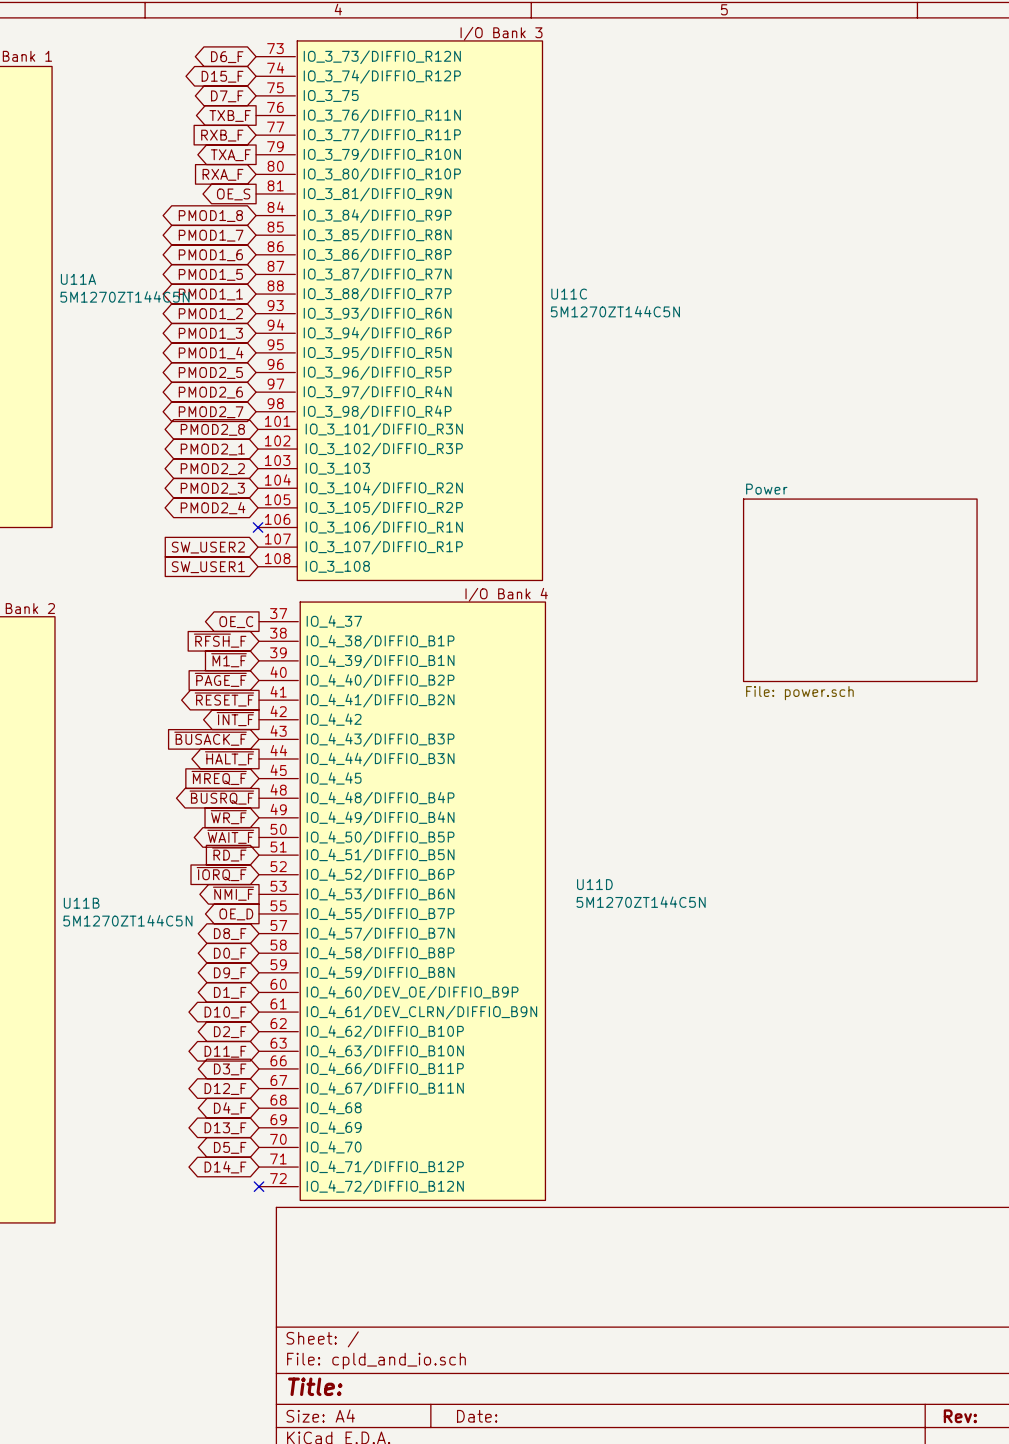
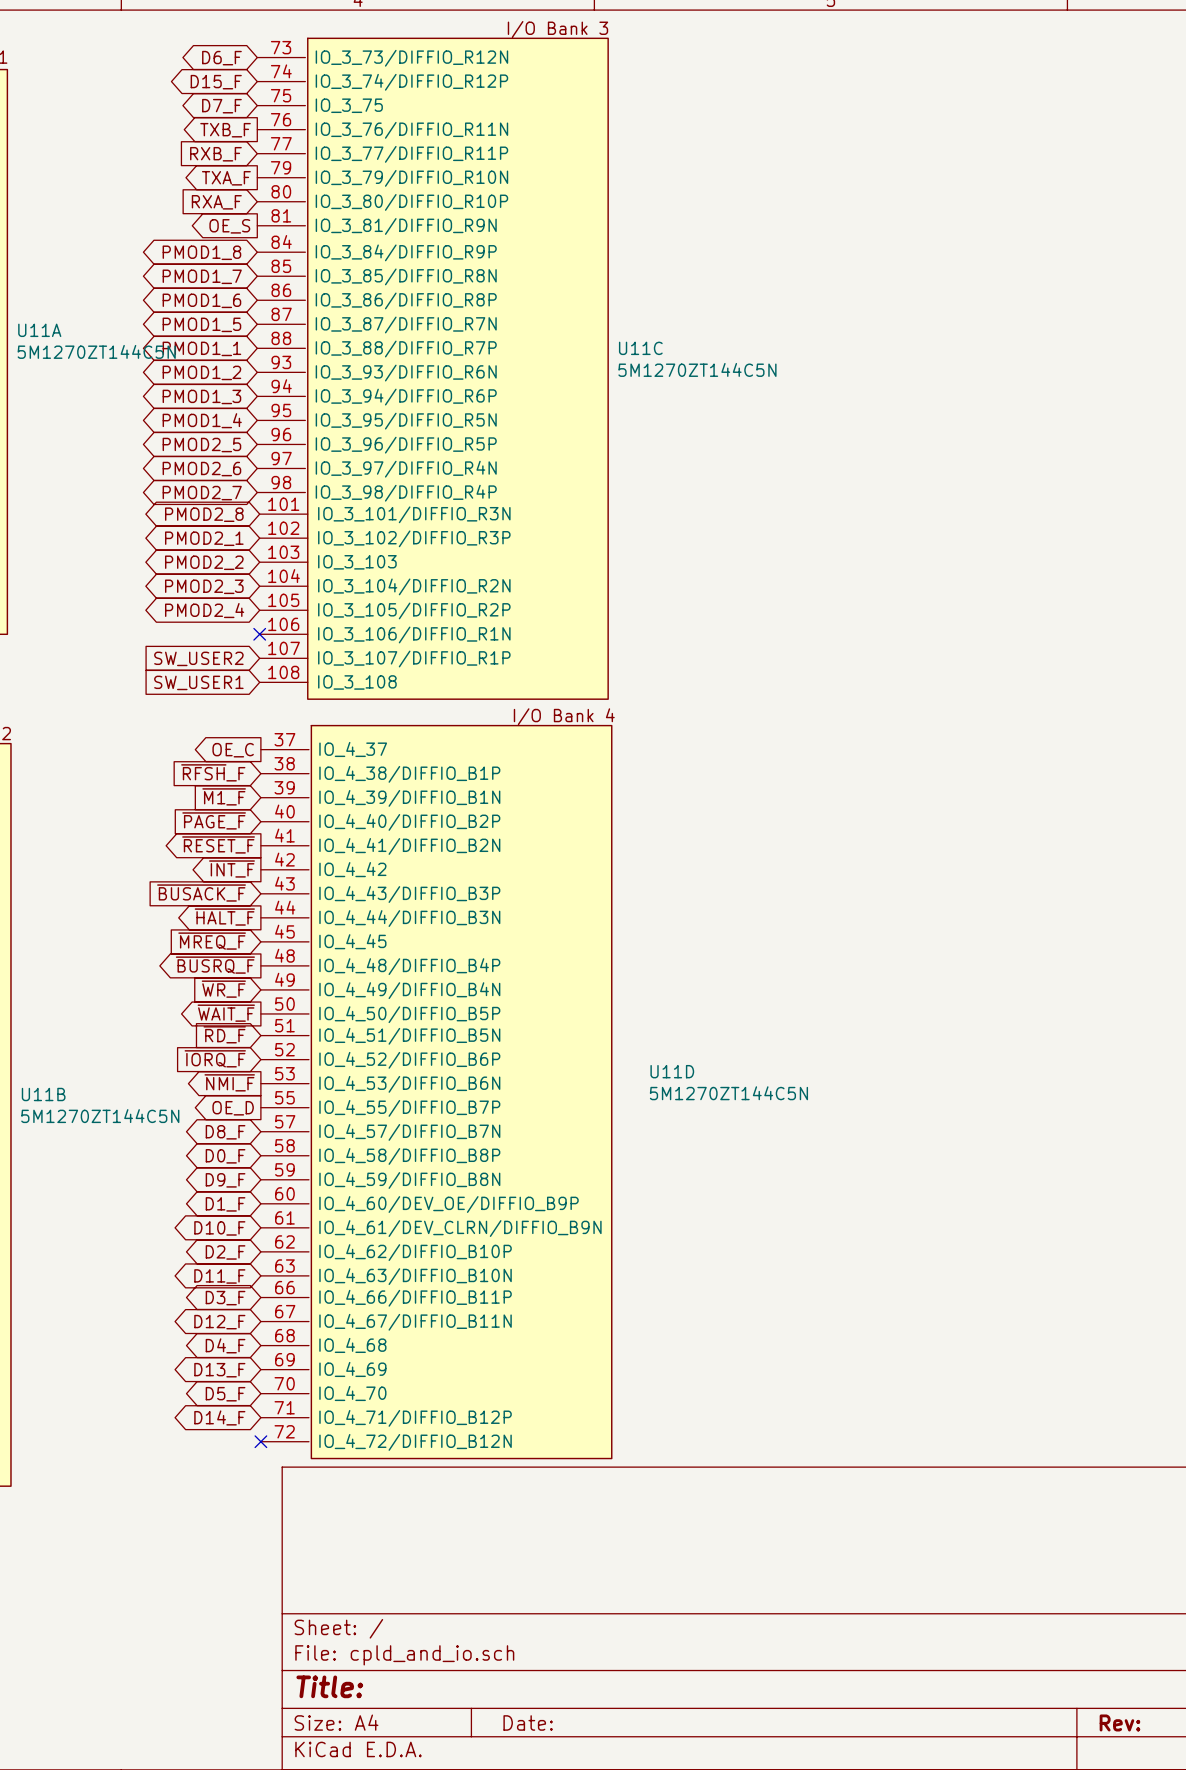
sheet Power: File: power.sch (860, 590) -> none

